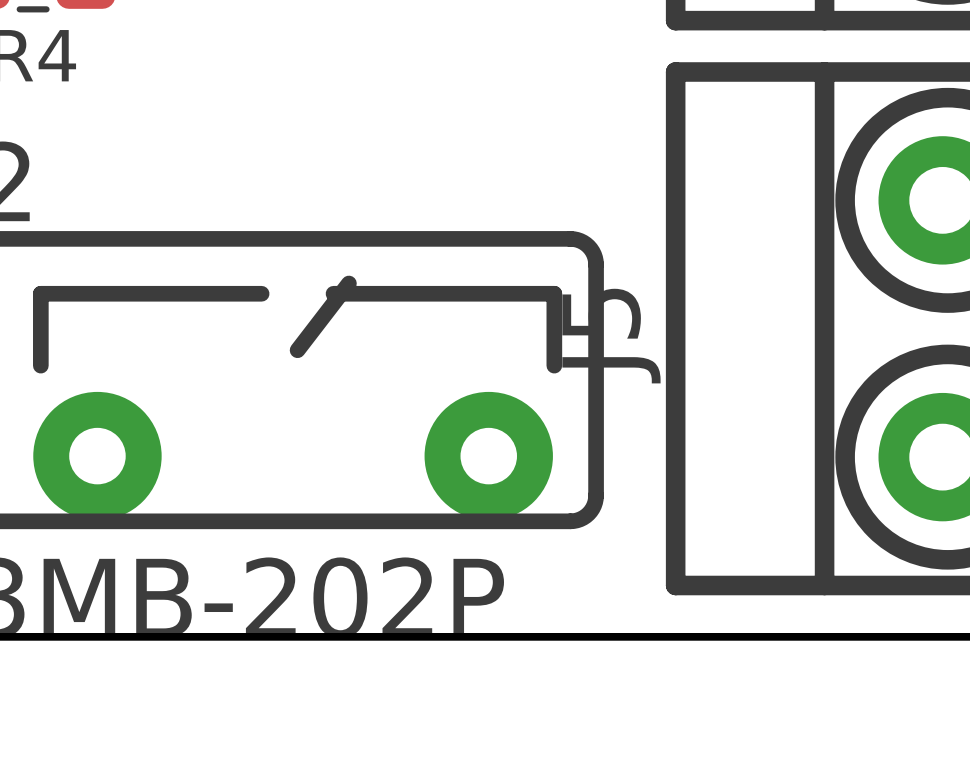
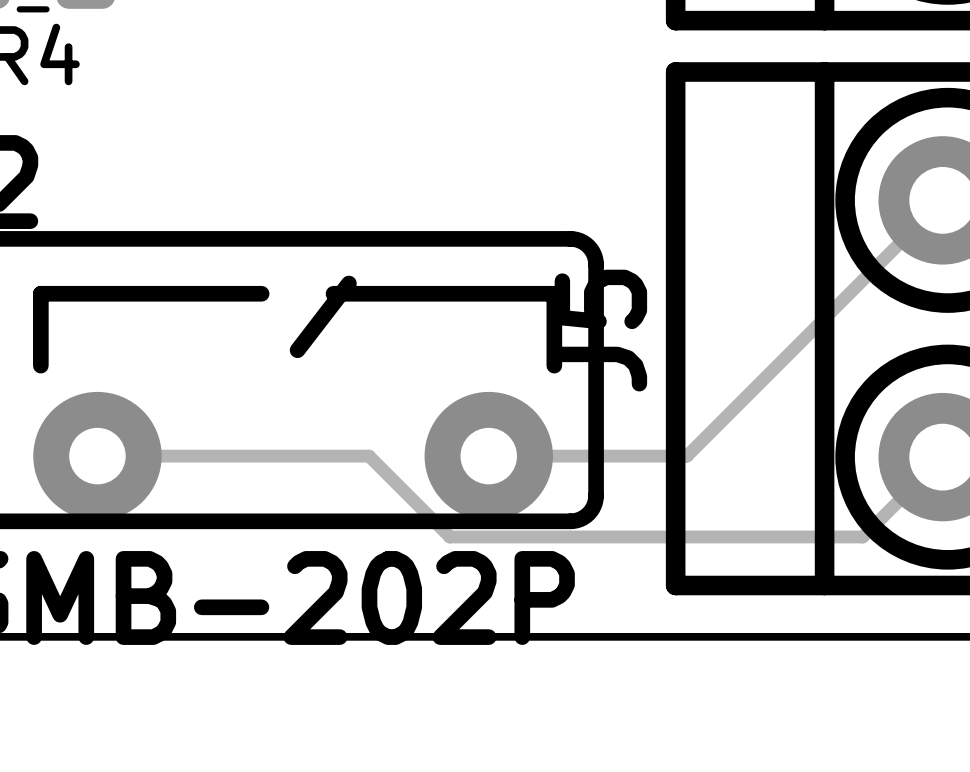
track: none -> (942, 200) (686, 456) (488, 456)
track: none -> (97, 456) (369, 456) (449, 536) (862, 536) (942, 457)

